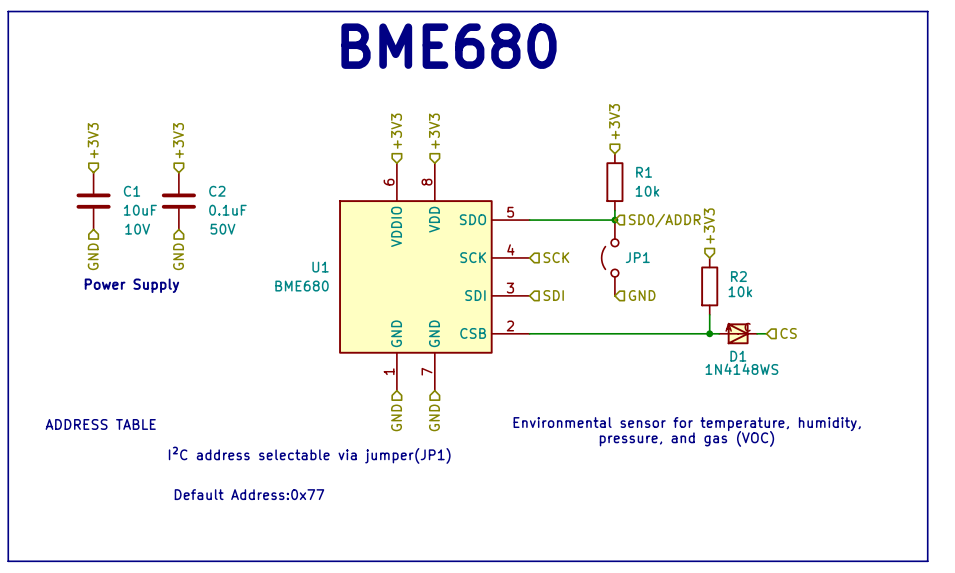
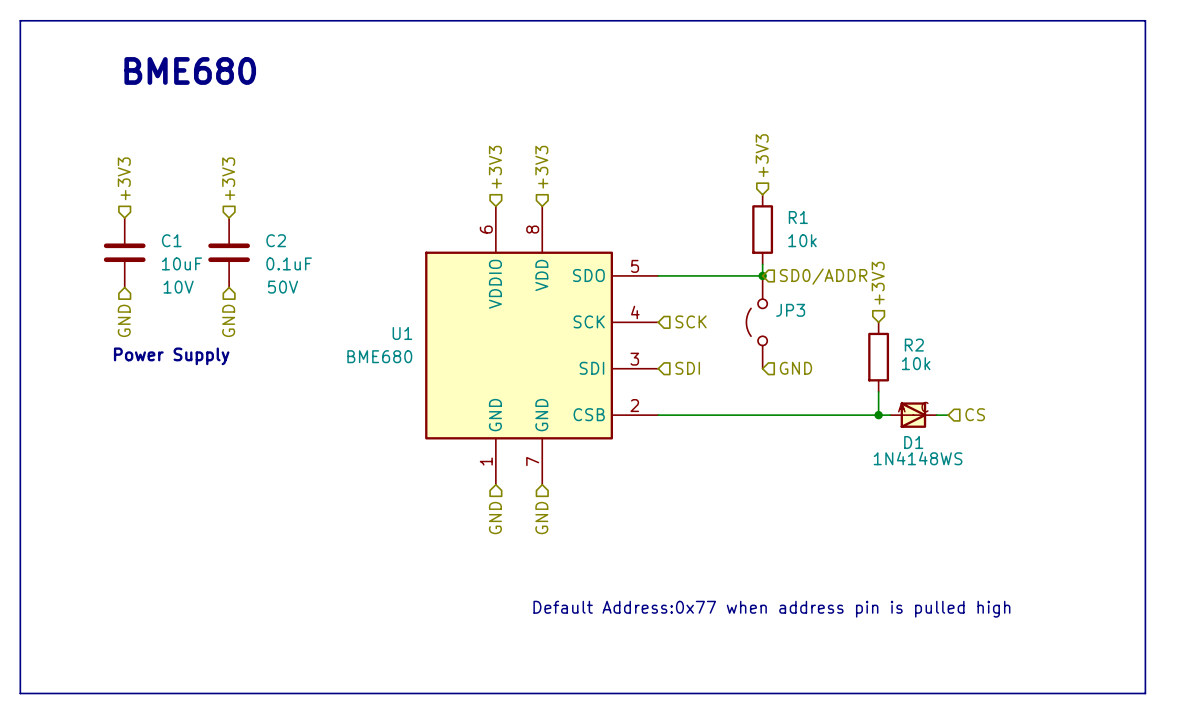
text: BME680 (448, 46) -> none
text: none -> BME680 (190, 70)
JP1 name: JP1 (637, 257) -> JP3 (790, 310)
text: ADDRESS TABLE (100, 424) -> none
text: Environmental sensor for temperature, humidity, (687, 424) -> none
text: pressure, and gas (VOC) (686, 438) -> none
text: I²C address selectable via jumper(JP1) (309, 455) -> none
text: none -> Default Address:0x77 when address pin is pulled high (771, 609)
text: Default Address:0x77 (249, 494) -> none

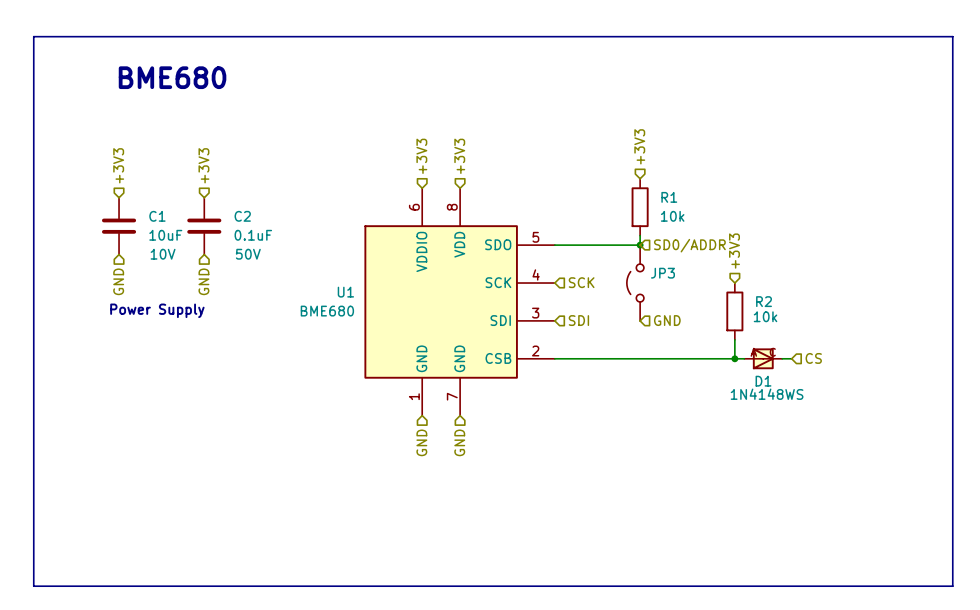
text: Default Address:0x77 when address pin is pulled high (771, 609) -> none

